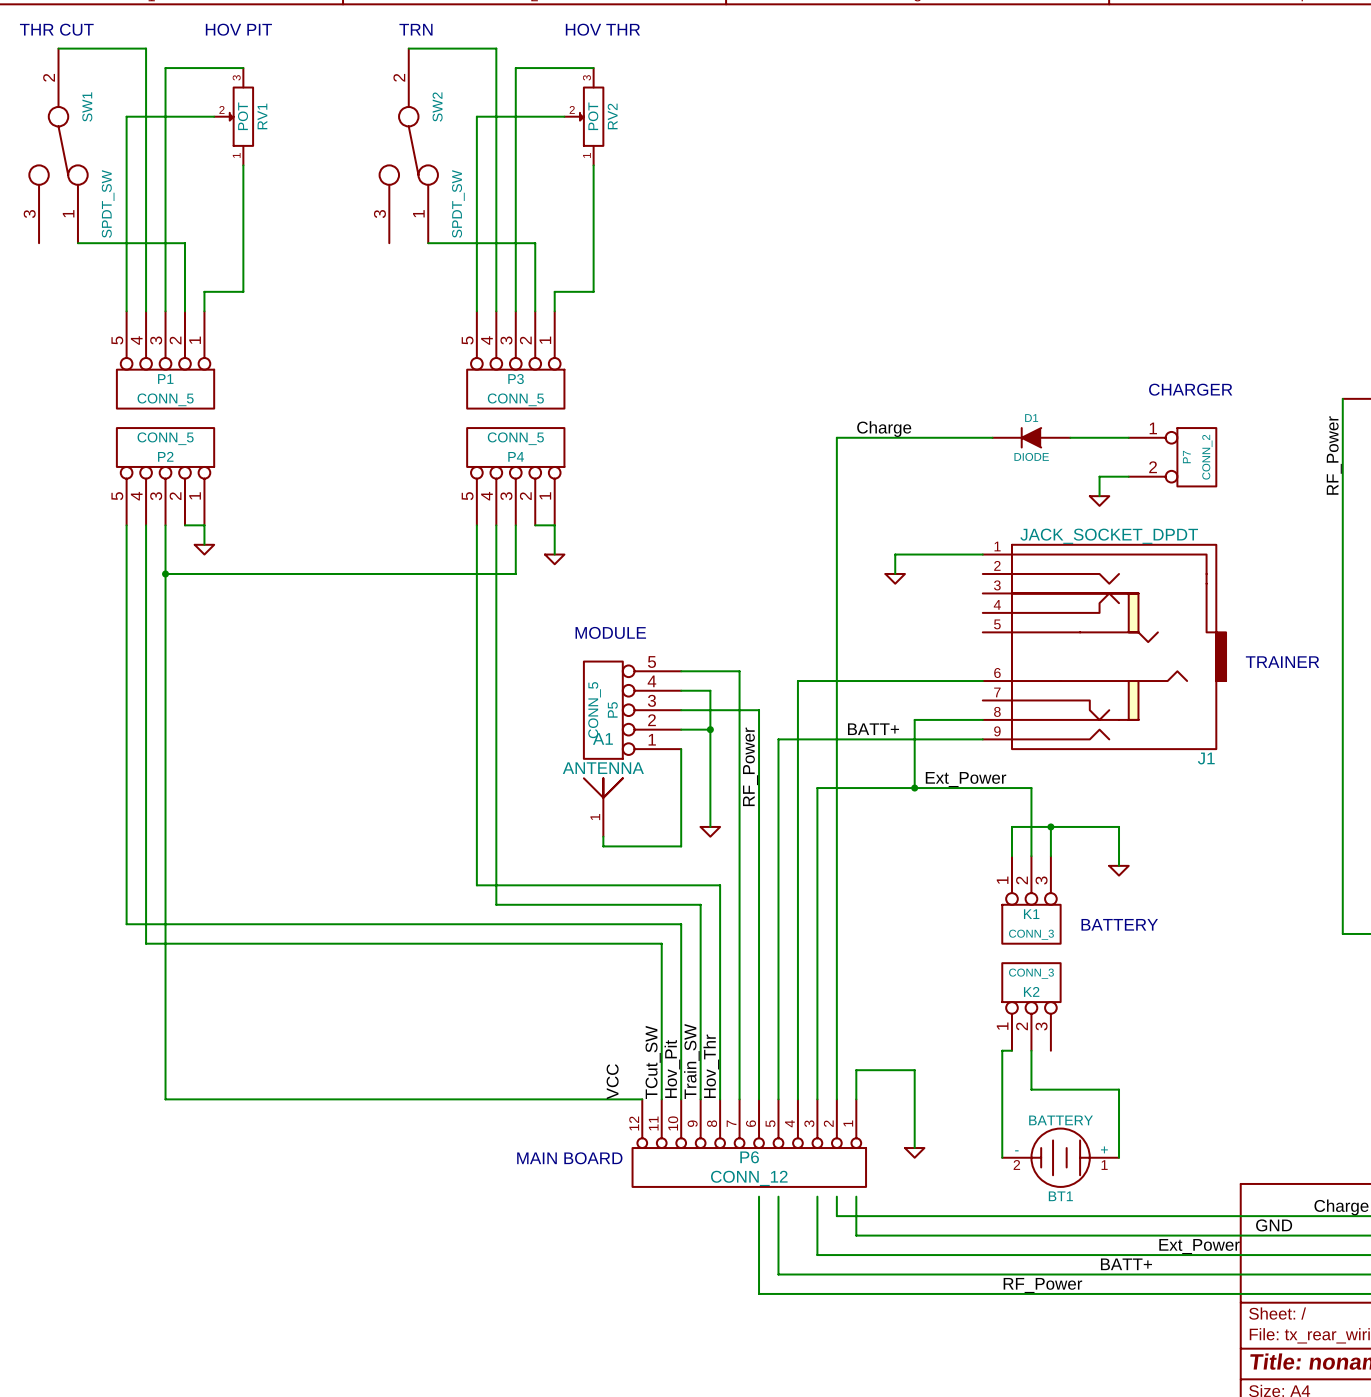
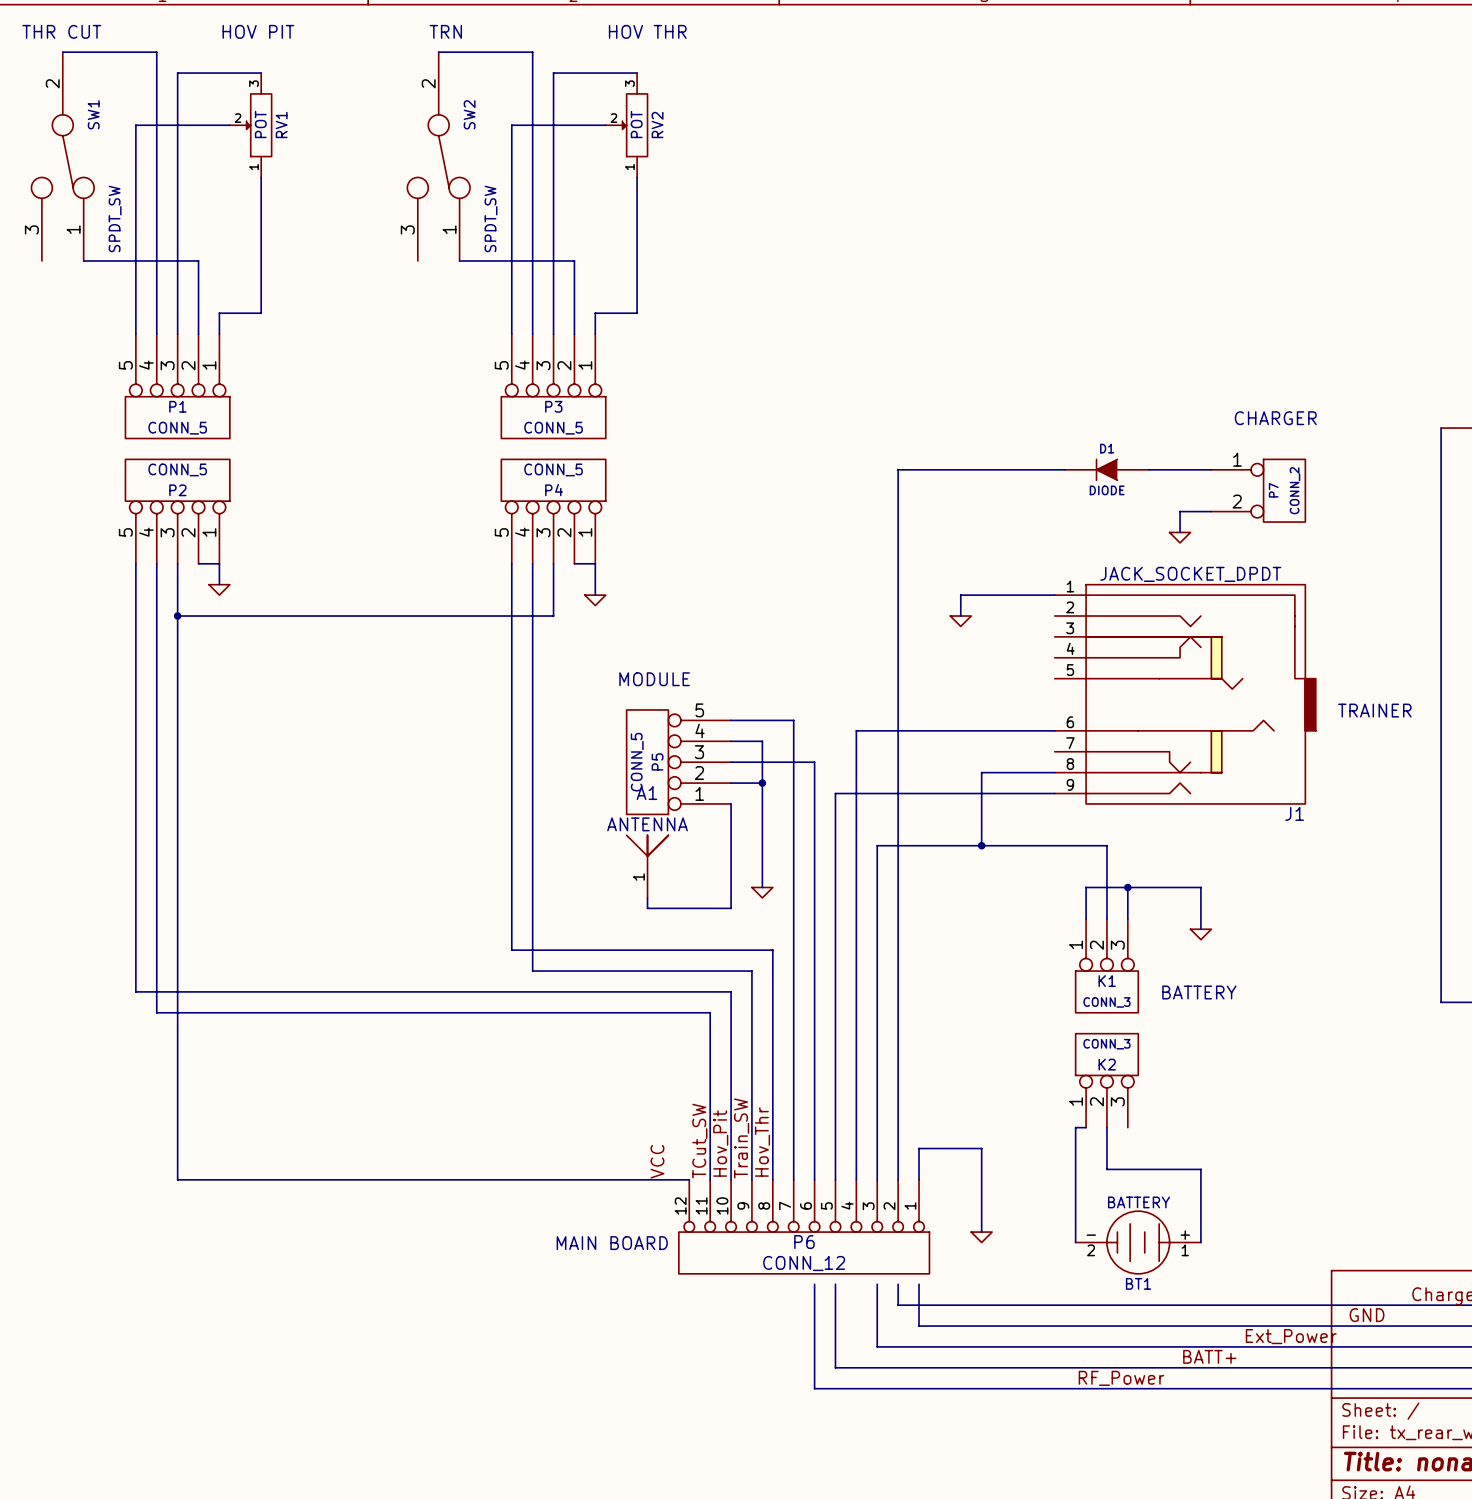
label: Charge (884, 429) -> none
label: RF_Power (1334, 455) -> none
label: BATT+ (873, 729) -> none
label: RF_Power (750, 766) -> none
label: Ext_Power (966, 779) -> none

